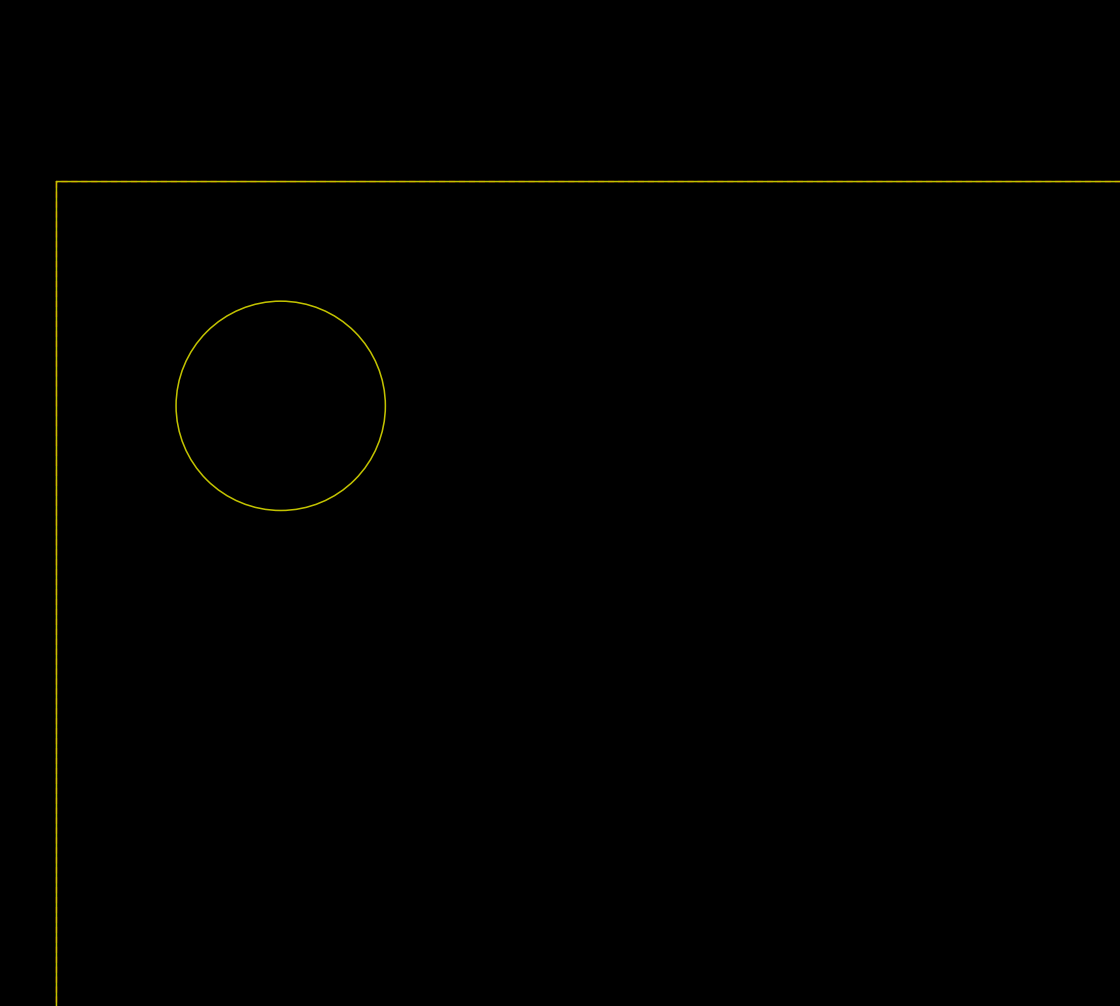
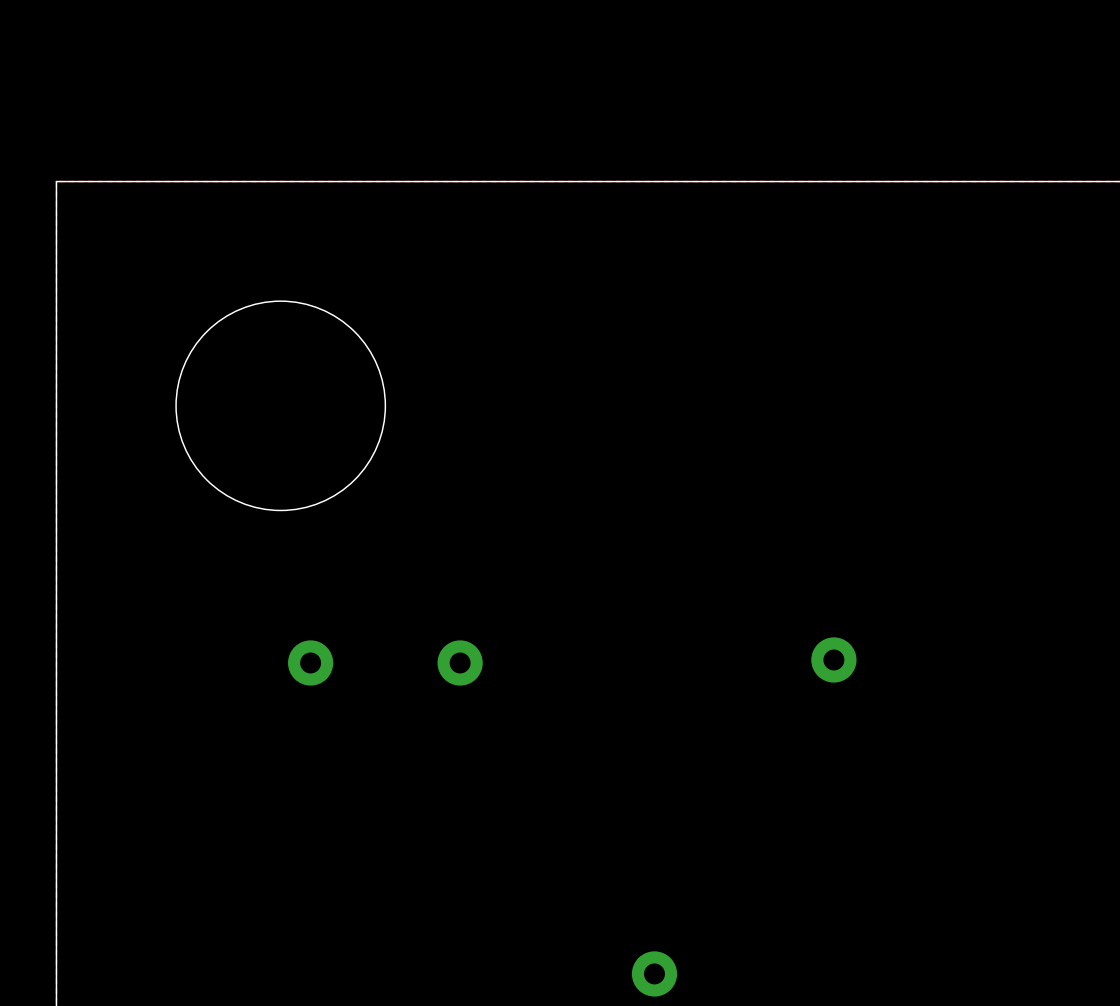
via: none -> (833, 659)
via: none -> (310, 662)
via: none -> (460, 662)
via: none -> (654, 973)

